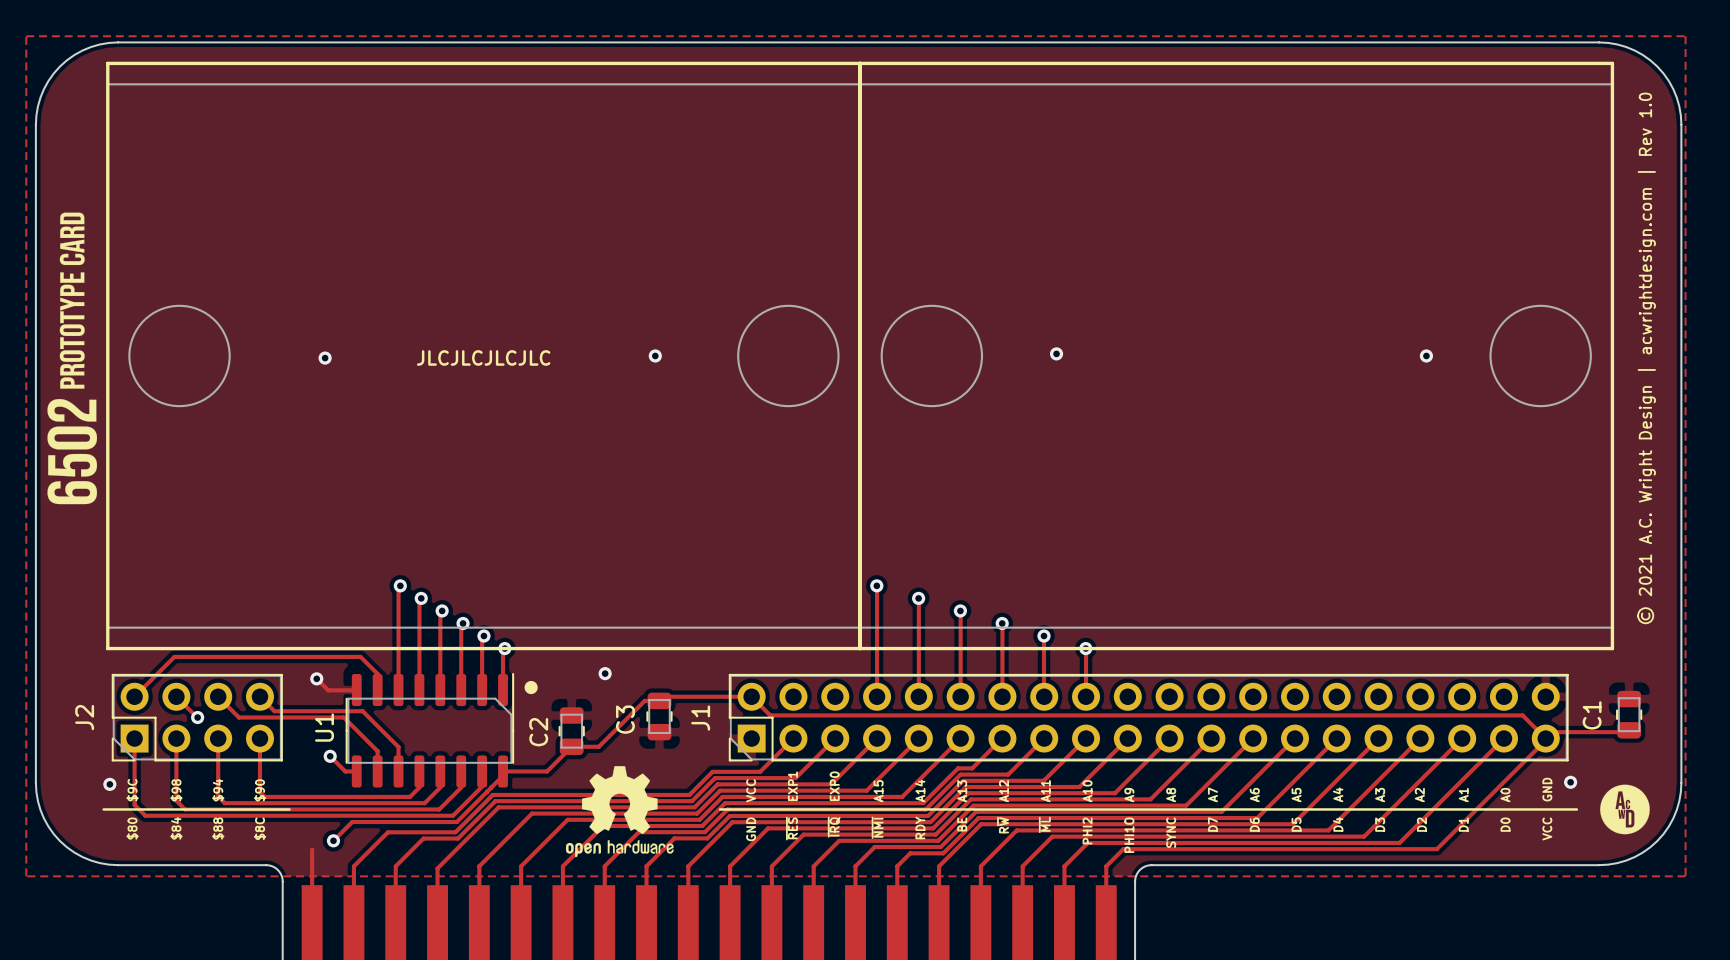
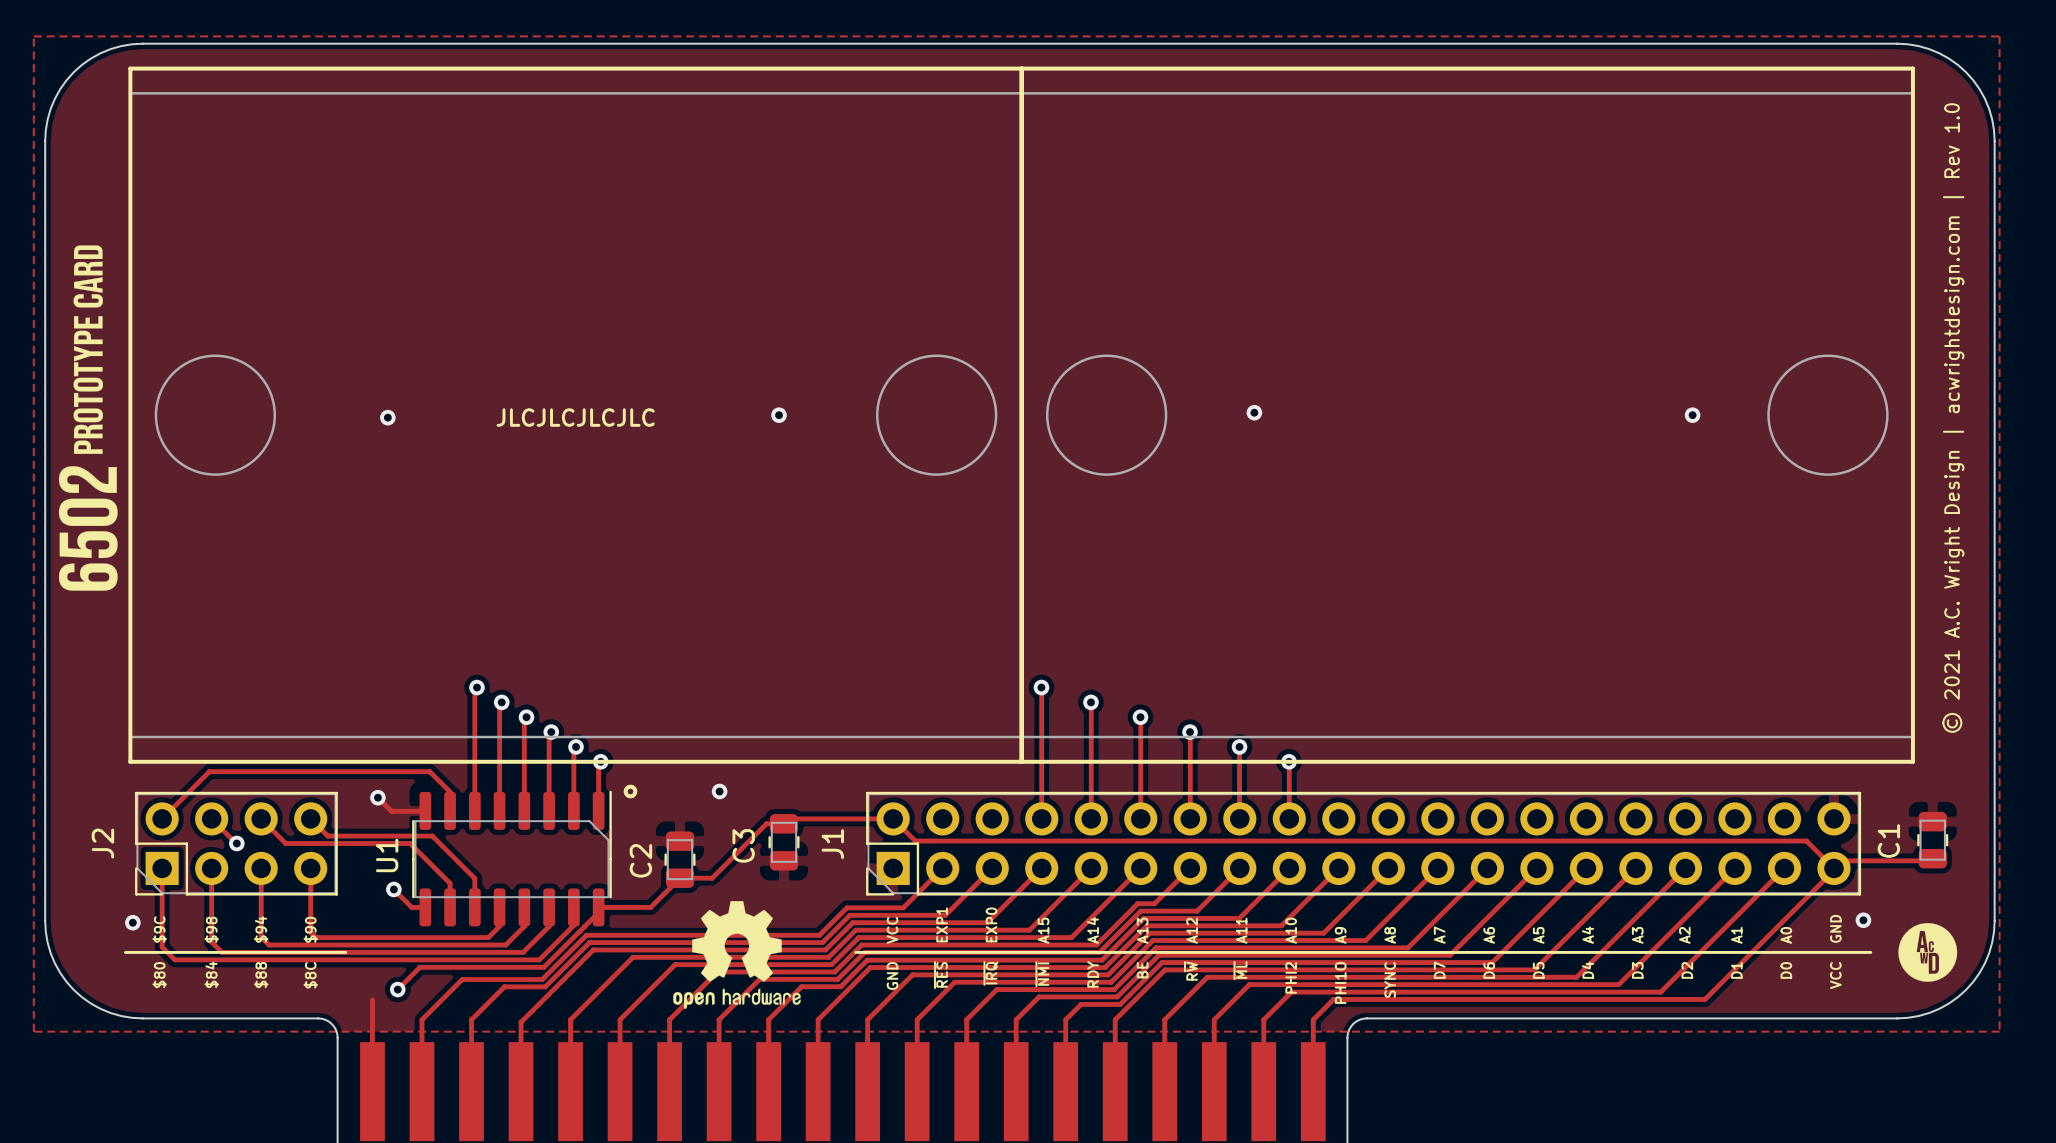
drawing: none -> [623, 784, 638, 799]
drawing: [524, 680, 538, 695] -> none

